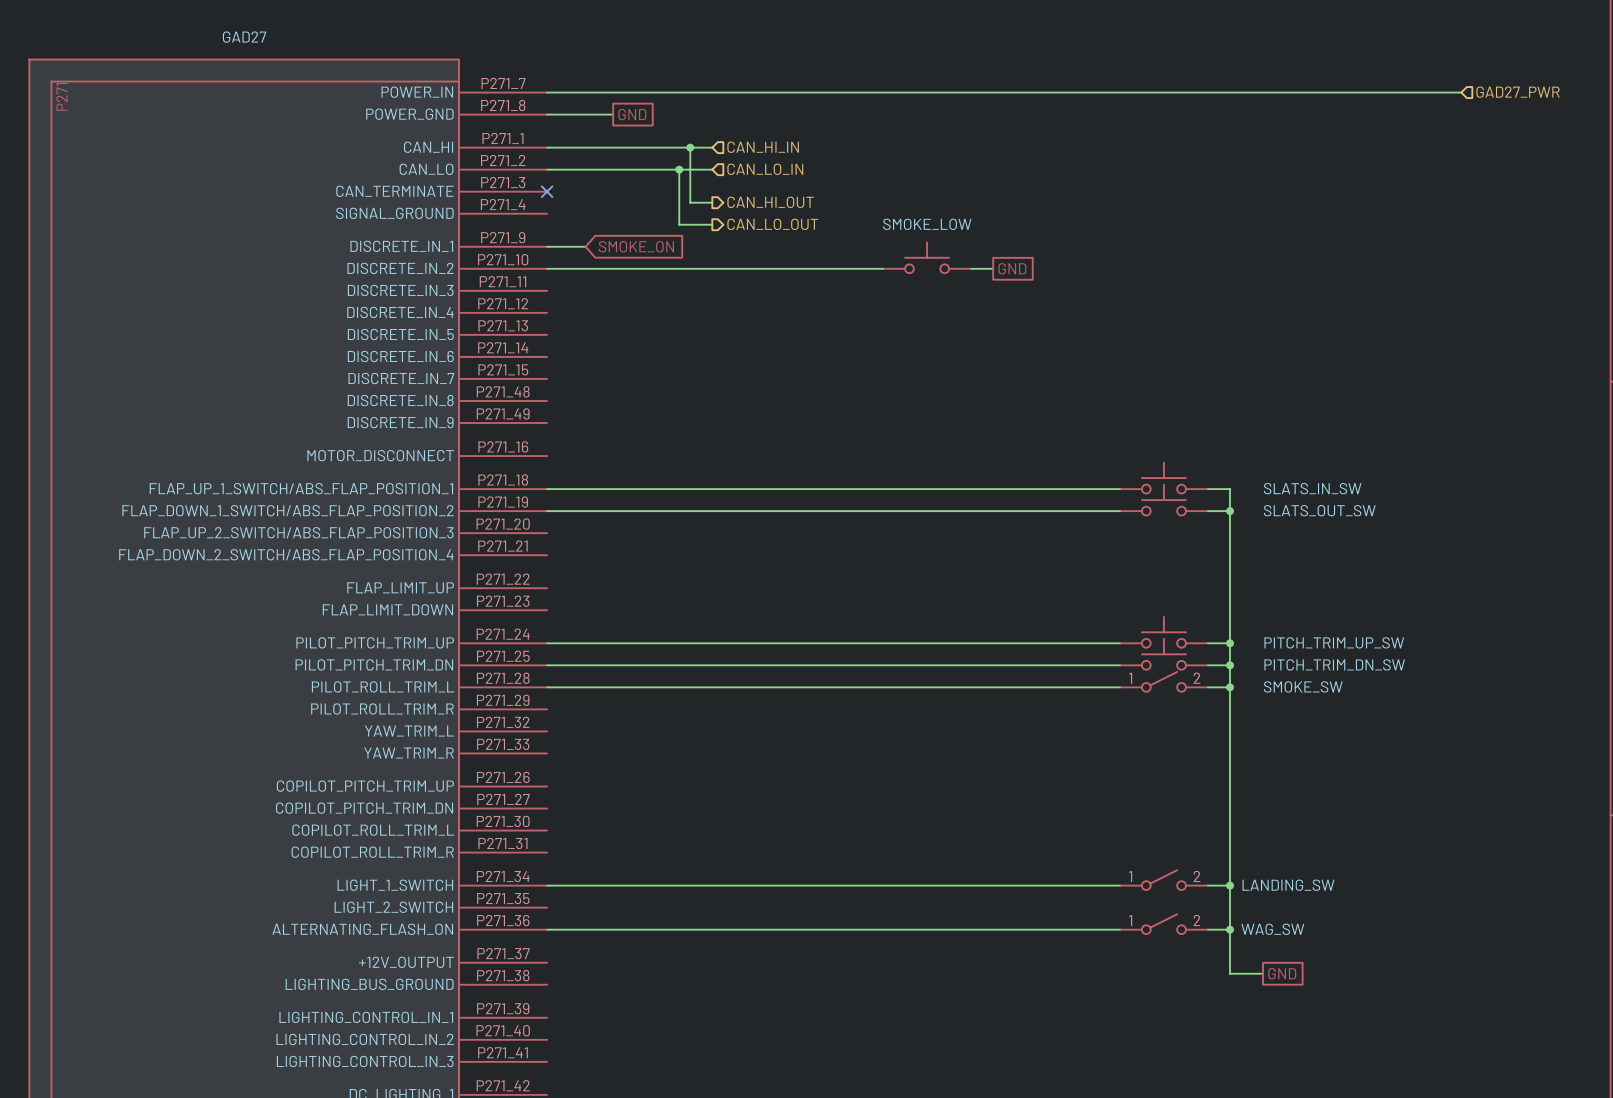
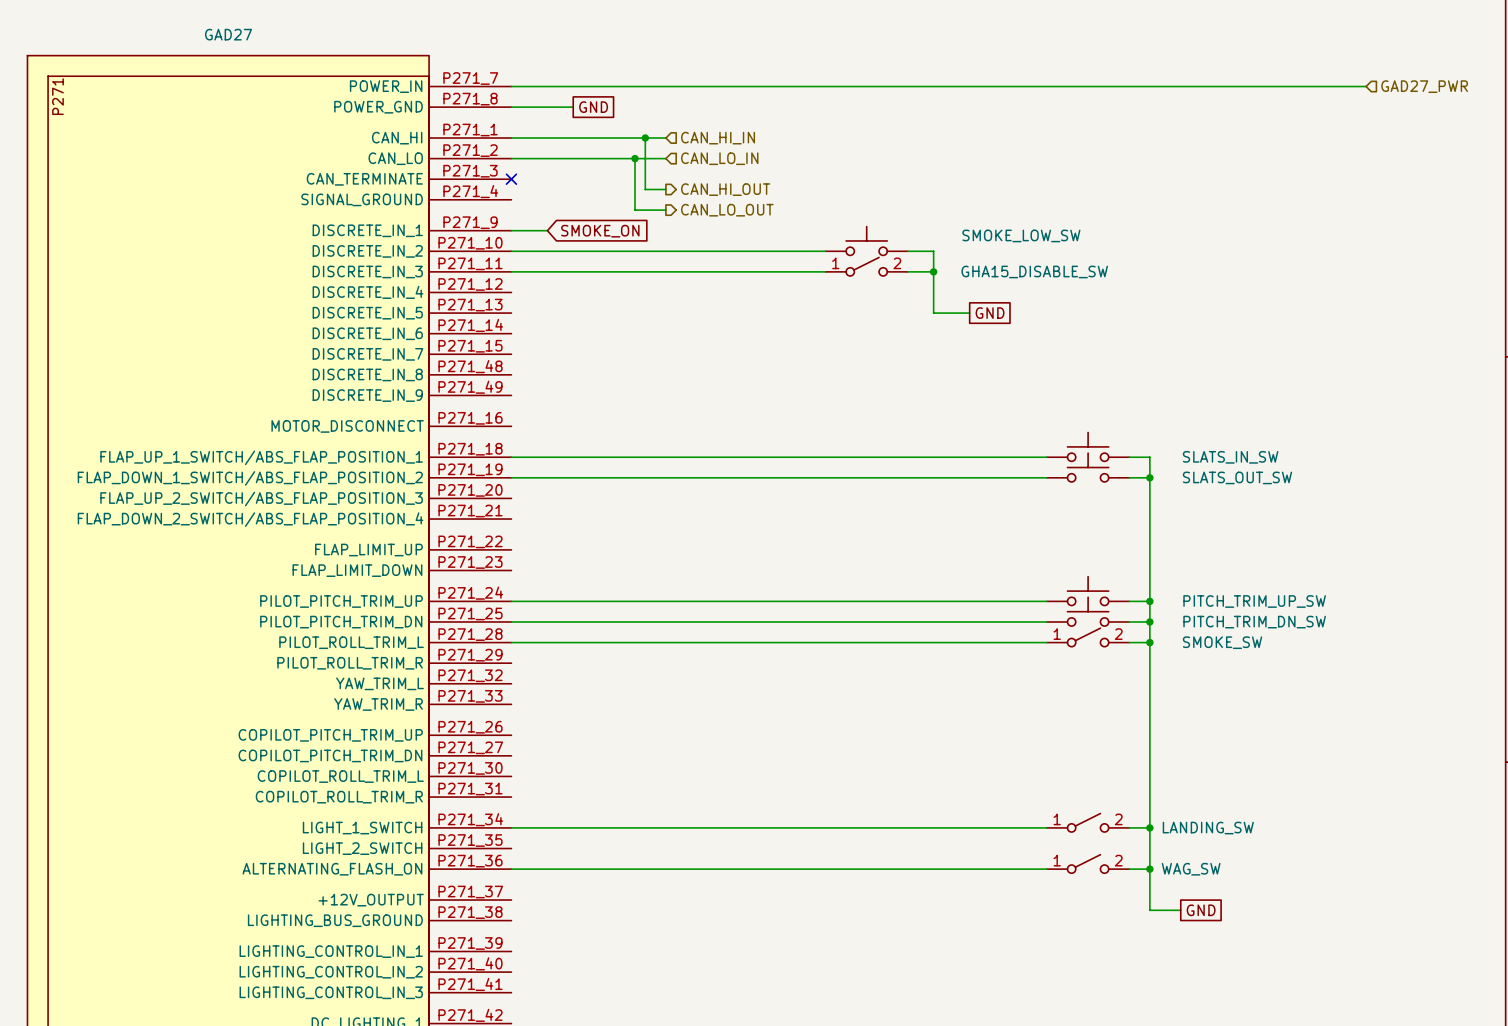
SMOKE_LOW name: SMOKE_LOW (927, 224) -> SMOKE_LOW_SW (1021, 235)
wire: none -> (928, 251) (933, 251) (933, 313) (969, 313)
global label position: GND (1012, 268) -> GND (990, 313)
GHA15_DISABLE_SW: none -> (866, 266)
wire: none -> (511, 271) (825, 271)
wire: none -> (907, 271) (933, 271)
junction: none -> (933, 271)

